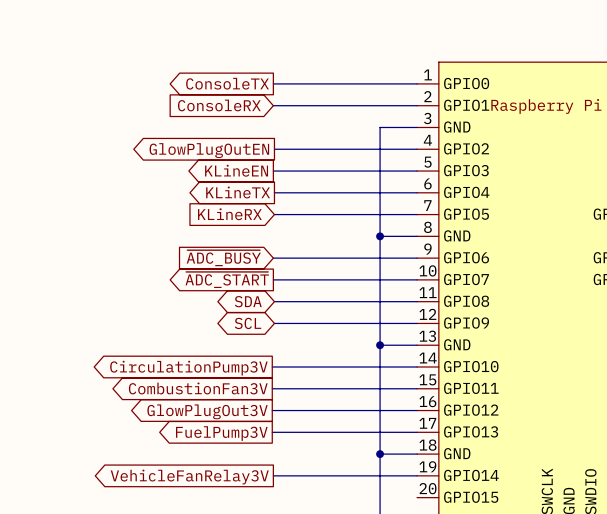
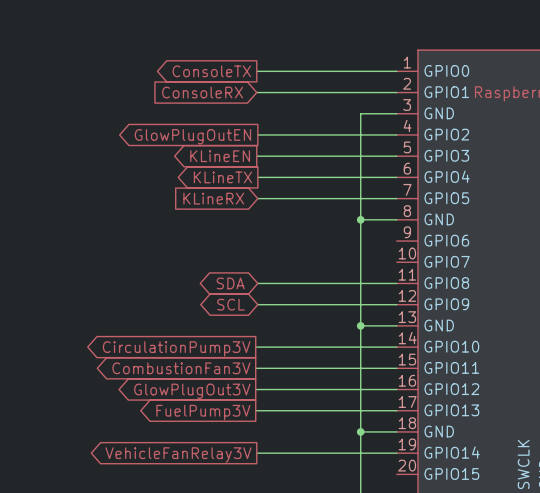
global label: ~{ADC_BUSY} (223, 258) -> none
wire: (273, 258) (417, 258) -> none
global label: ~{ADC_START} (227, 279) -> none
wire: (273, 279) (417, 279) -> none

